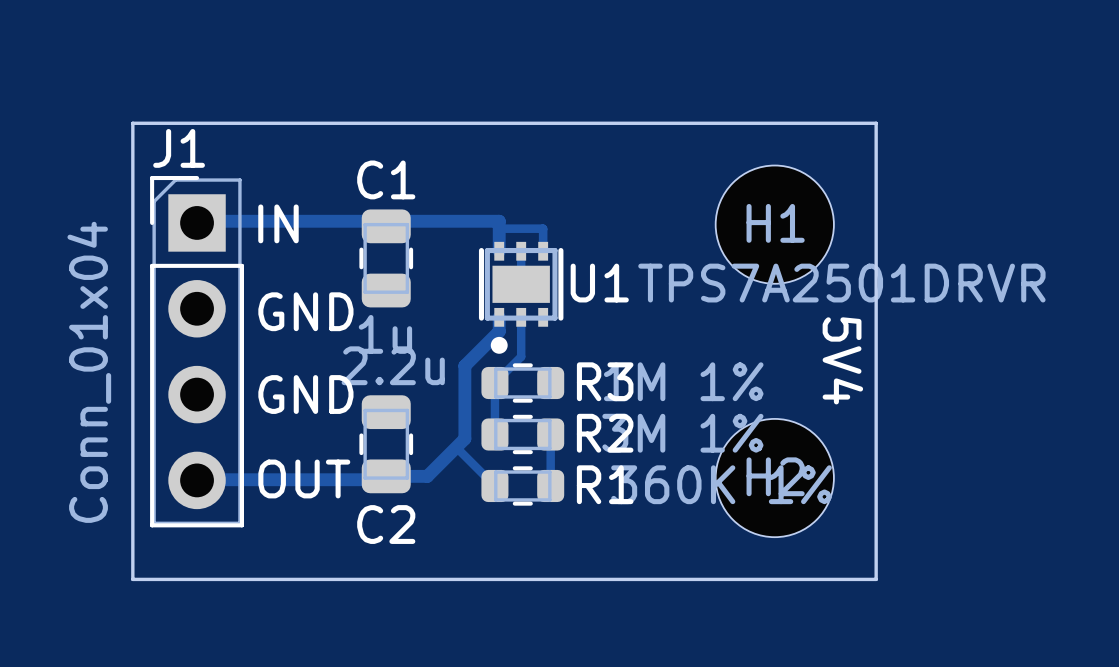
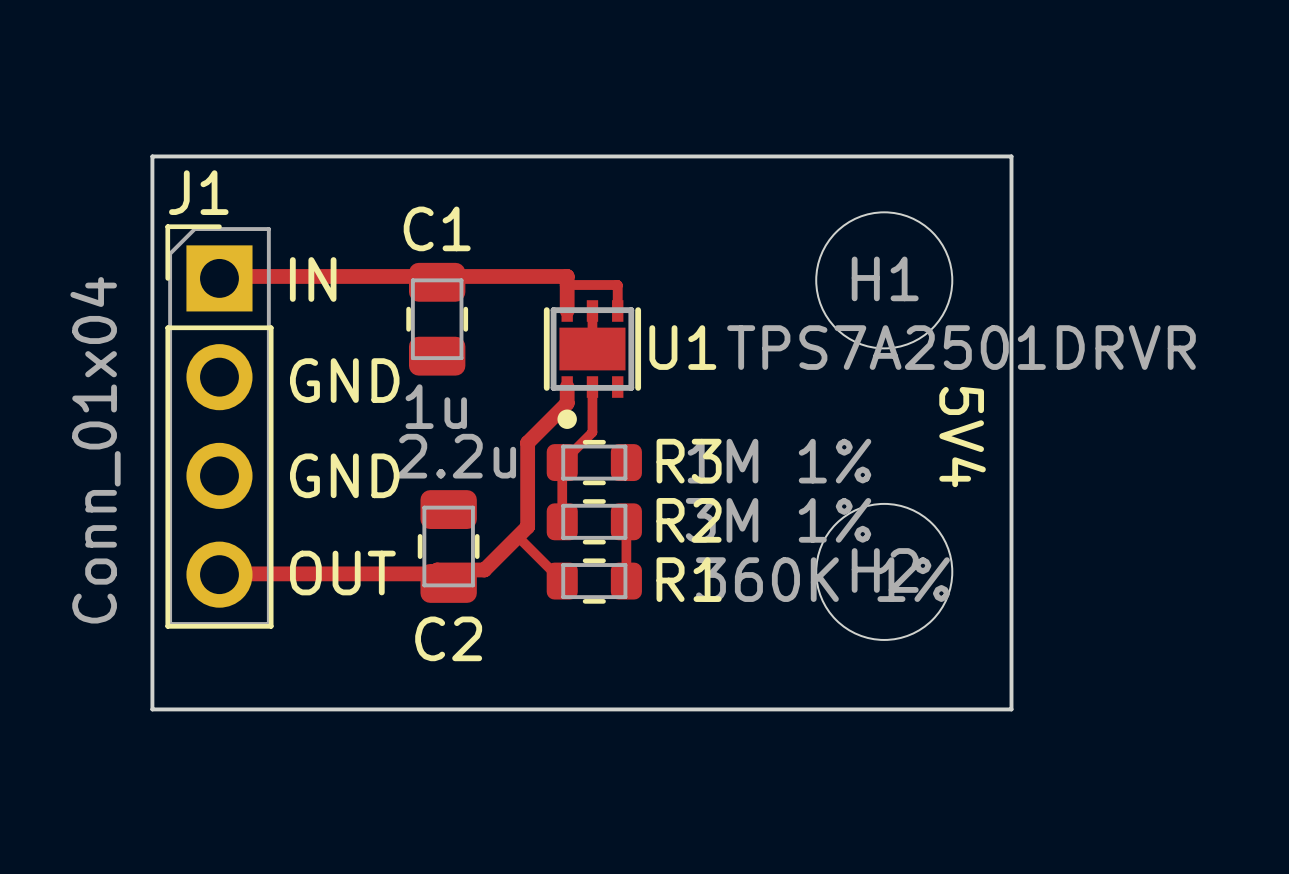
board edge: (132, 123) (876, 123) (876, 579) (132, 579) (132, 123) -> (152, 156) (152, 709) (1011, 709) (1011, 156) (152, 156)
C2 position: (386, 444) -> (448, 546)

